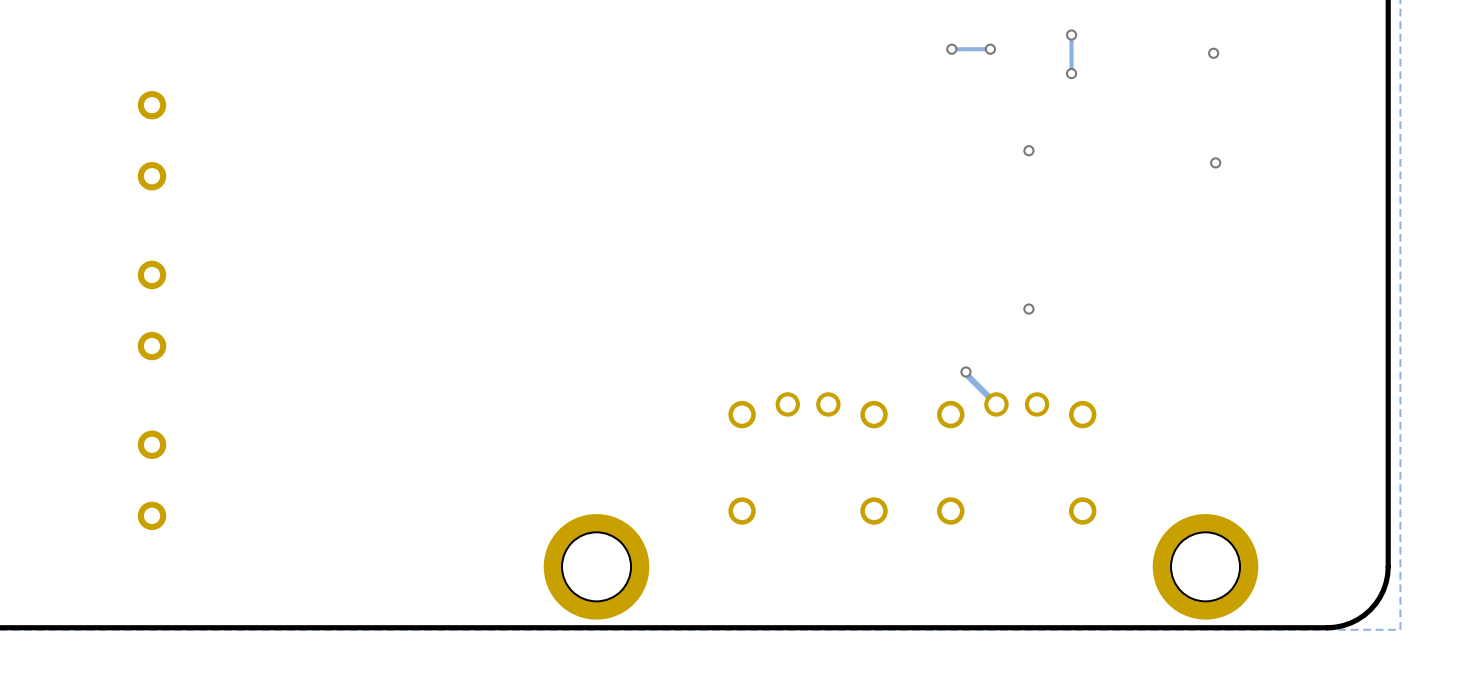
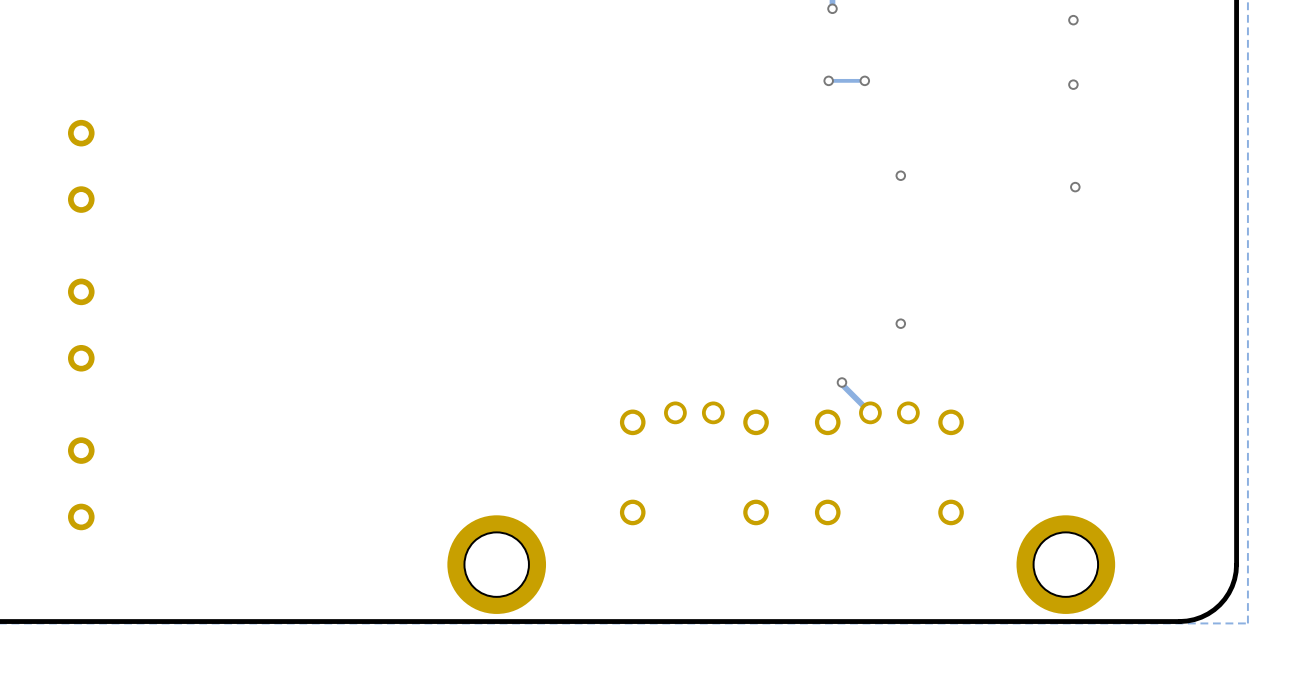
track: (1071, 35) (1071, 73) -> none
via: (1071, 35) -> none
via: (1071, 73) -> none

